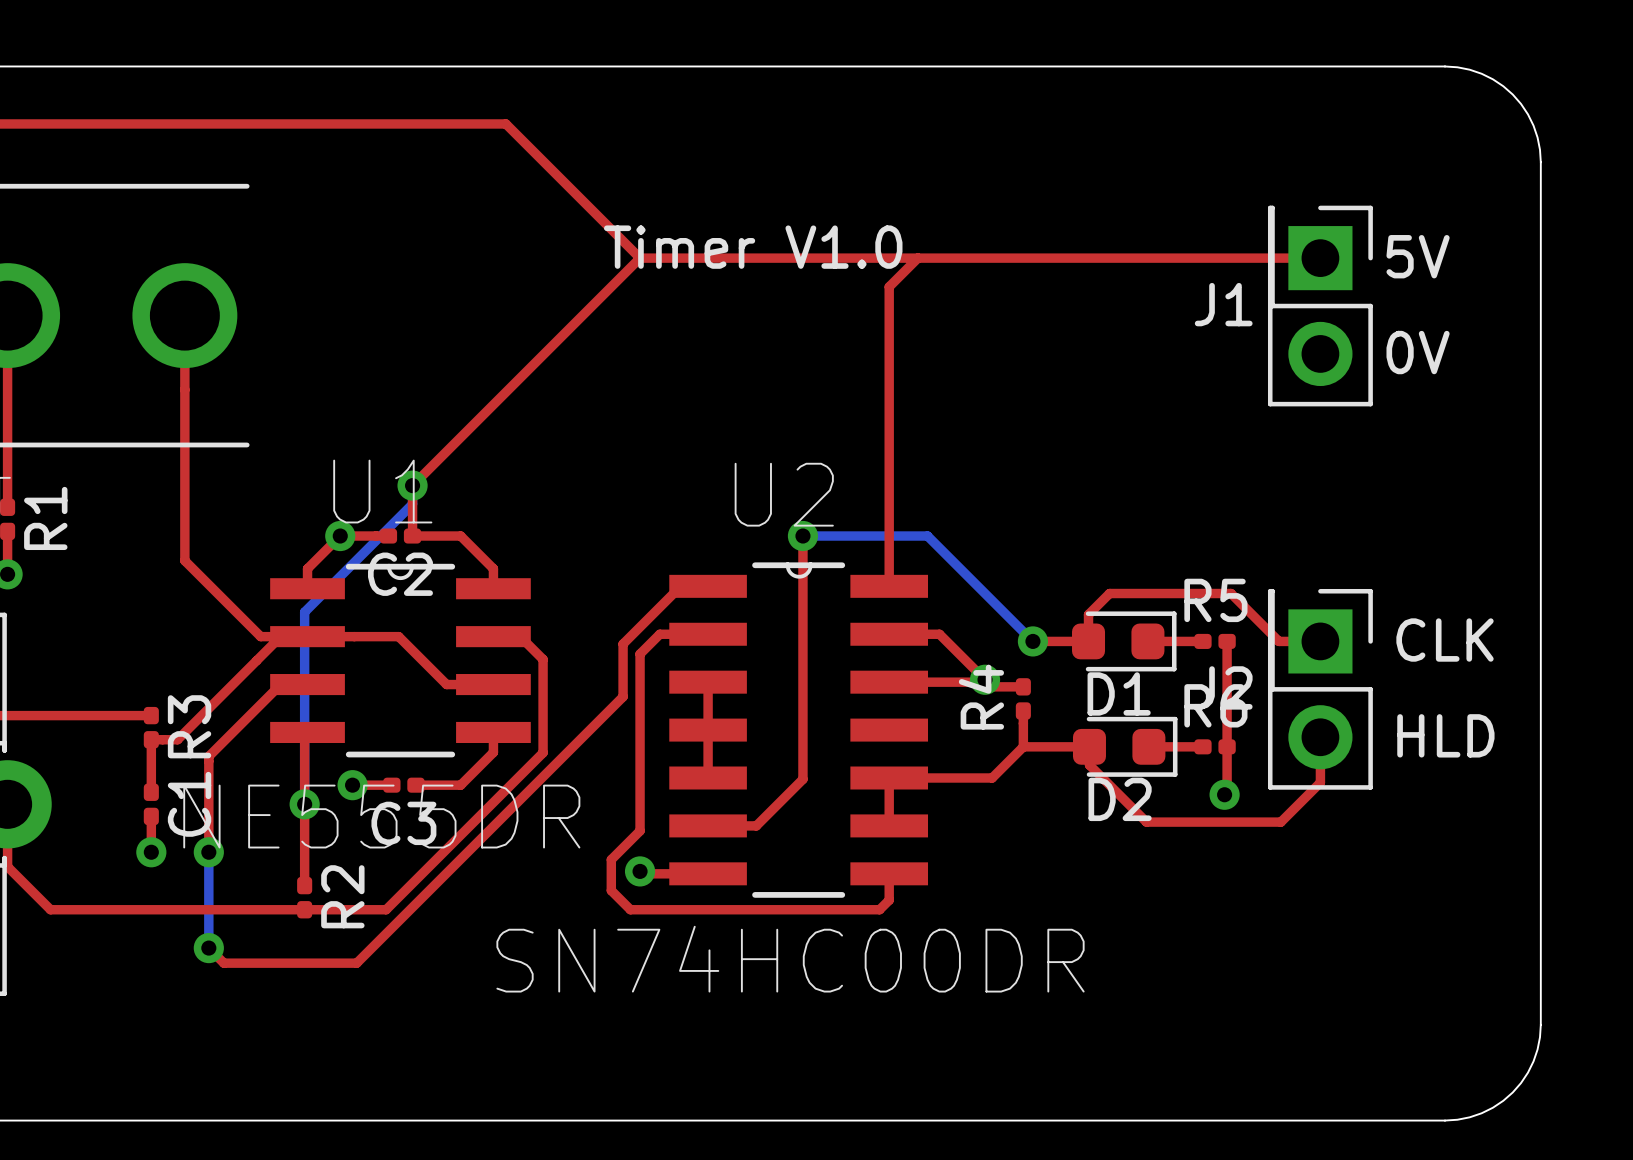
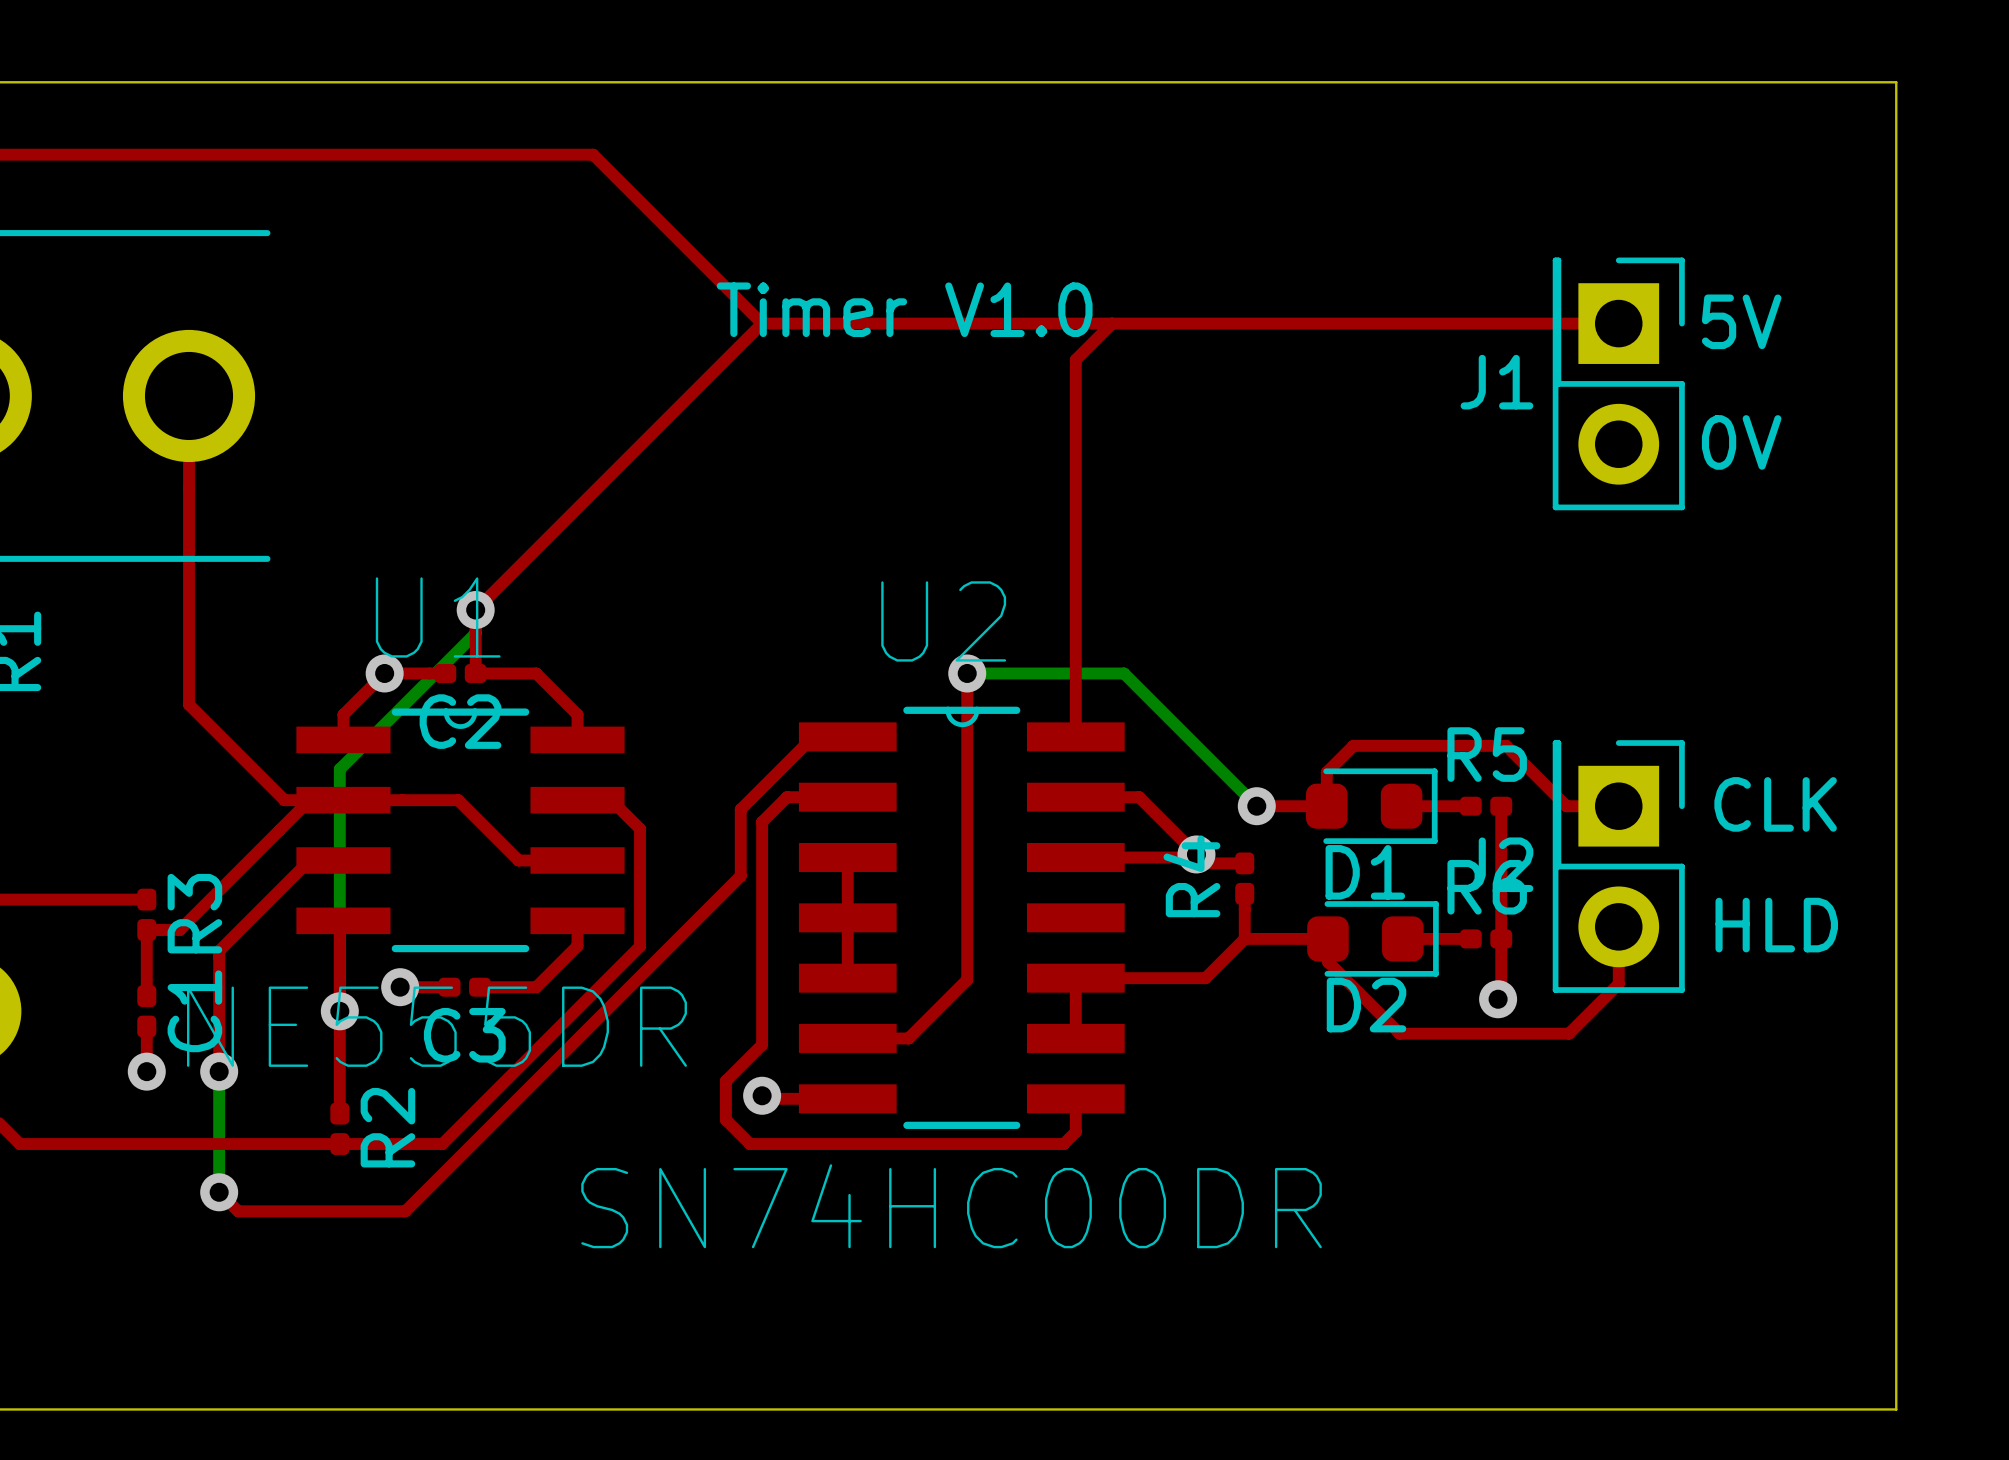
board edge: (1445, 66) (1457, 67) (1481, 73) (1503, 86) (1512, 94) (1521, 103) (1533, 125) (1537, 137) (1540, 162) -> (1775, 82) (1896, 82) (1896, 202)
board edge: (1540, 1024) (1537, 1049) (1533, 1061) (1527, 1072) (1512, 1092) (1492, 1107) (1481, 1113) (1457, 1119) (1445, 1120) -> (1896, 1288) (1896, 1409) (1775, 1409)

